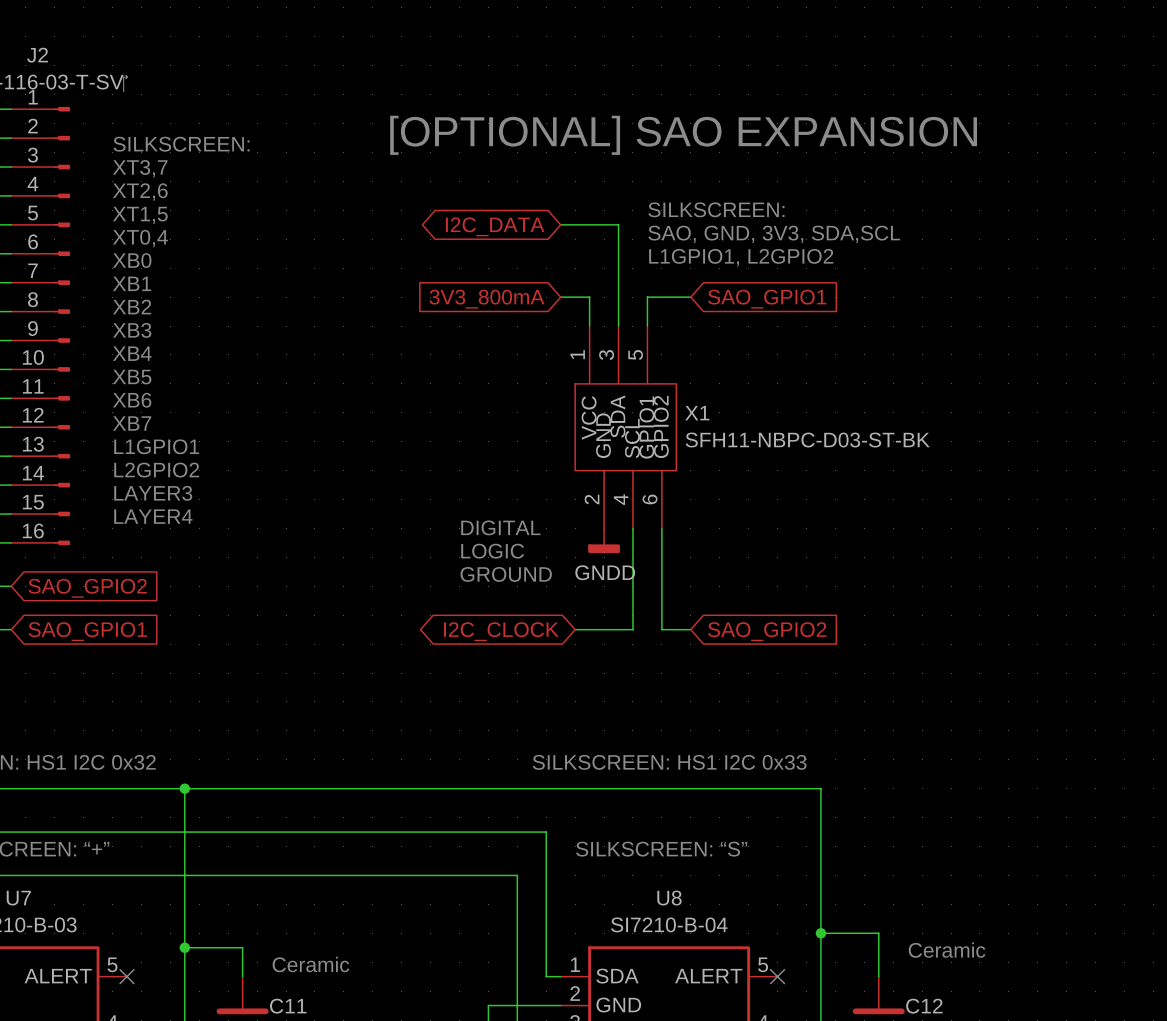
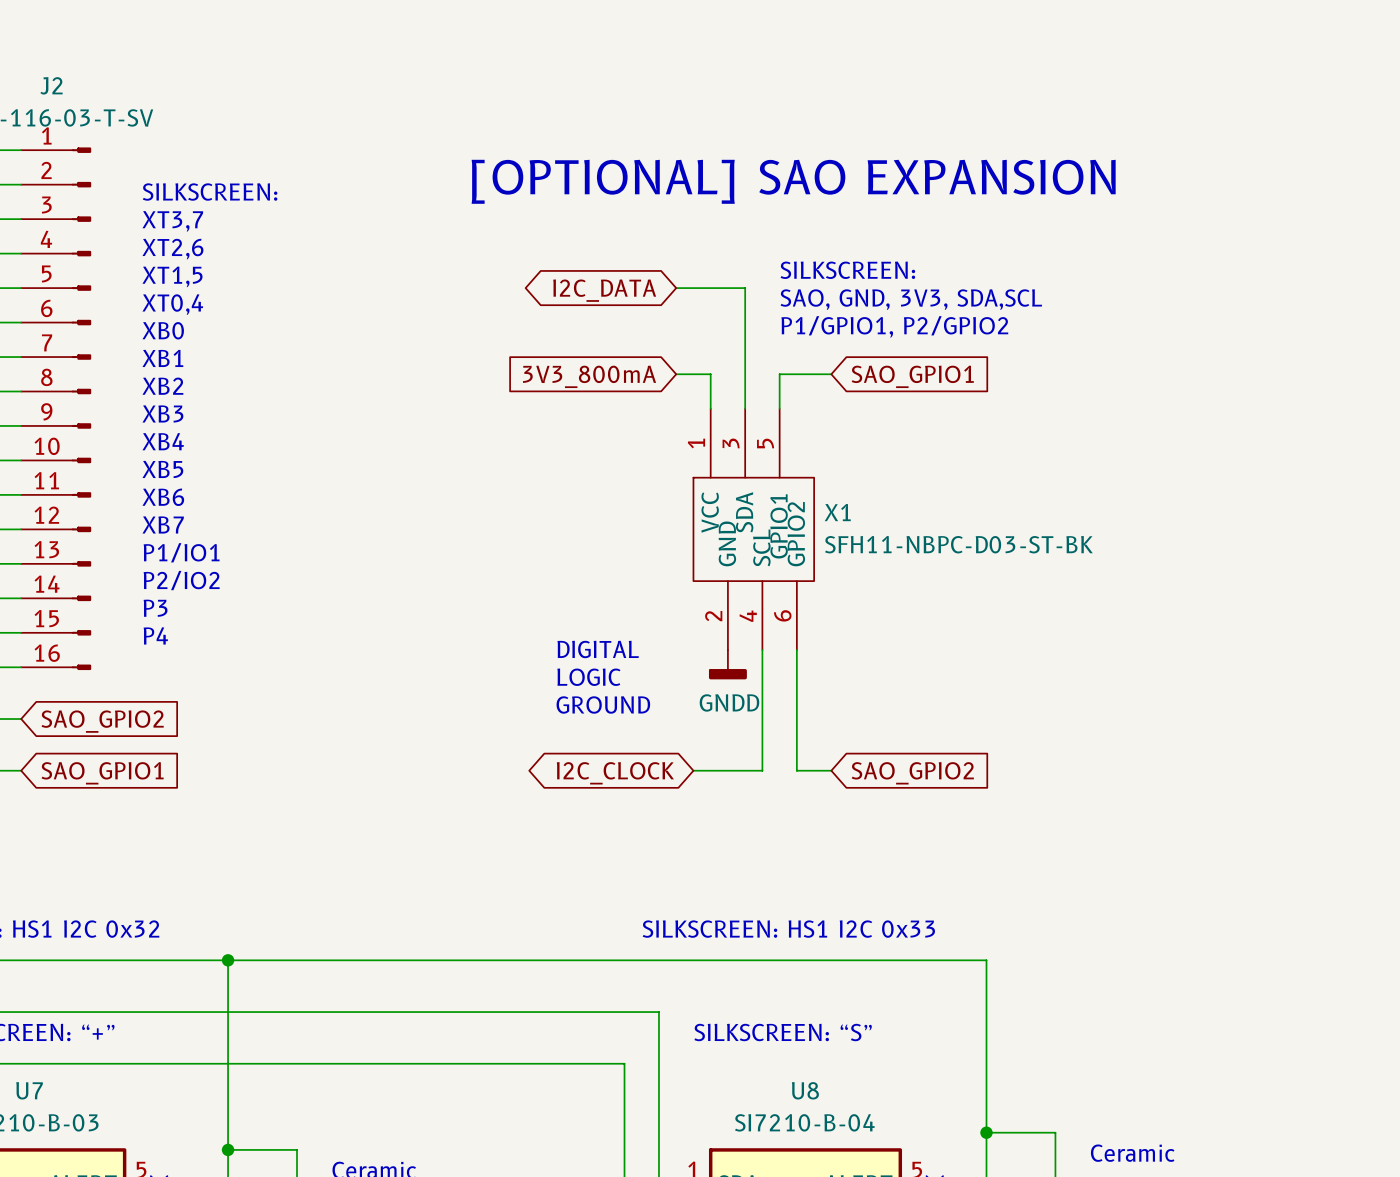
text: L1GPIO1, L2GPIO2 (741, 257) -> P1/GPIO1, P2/GPIO2 (894, 326)
text: L1GPIO1 (156, 446) -> P1/IO1 (181, 552)
text: L2GPIO2 (156, 470) -> P2/IO2 (181, 580)
text: LAYER3 (153, 493) -> P3 (155, 608)
text: LAYER4 (153, 516) -> P4 (155, 635)

